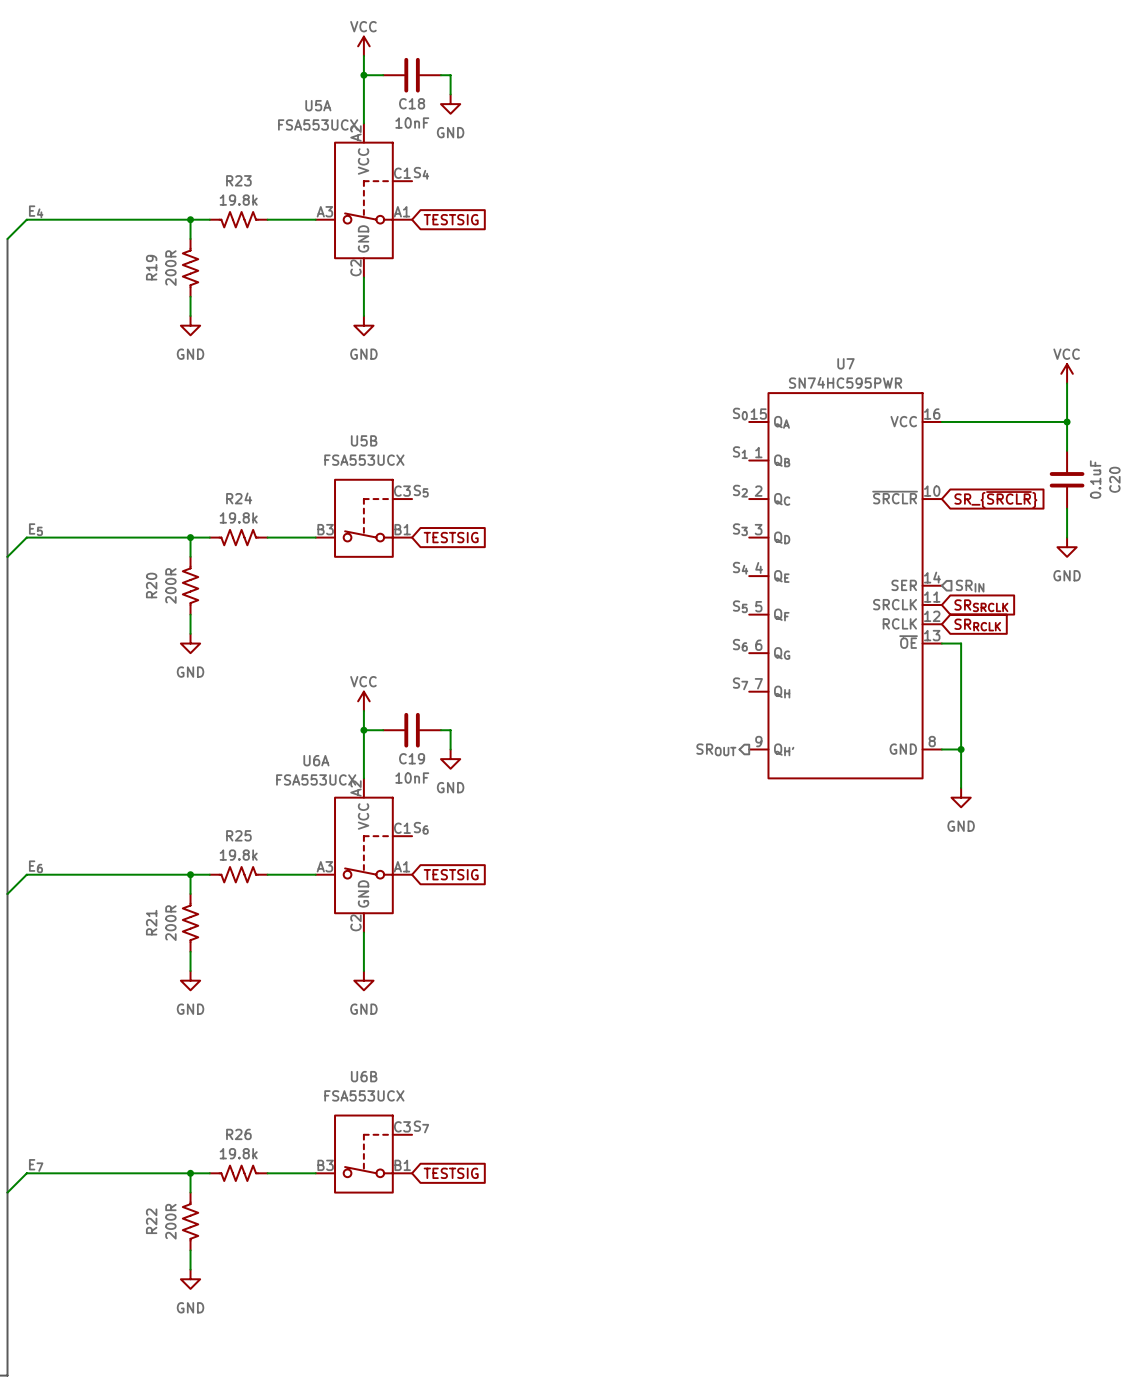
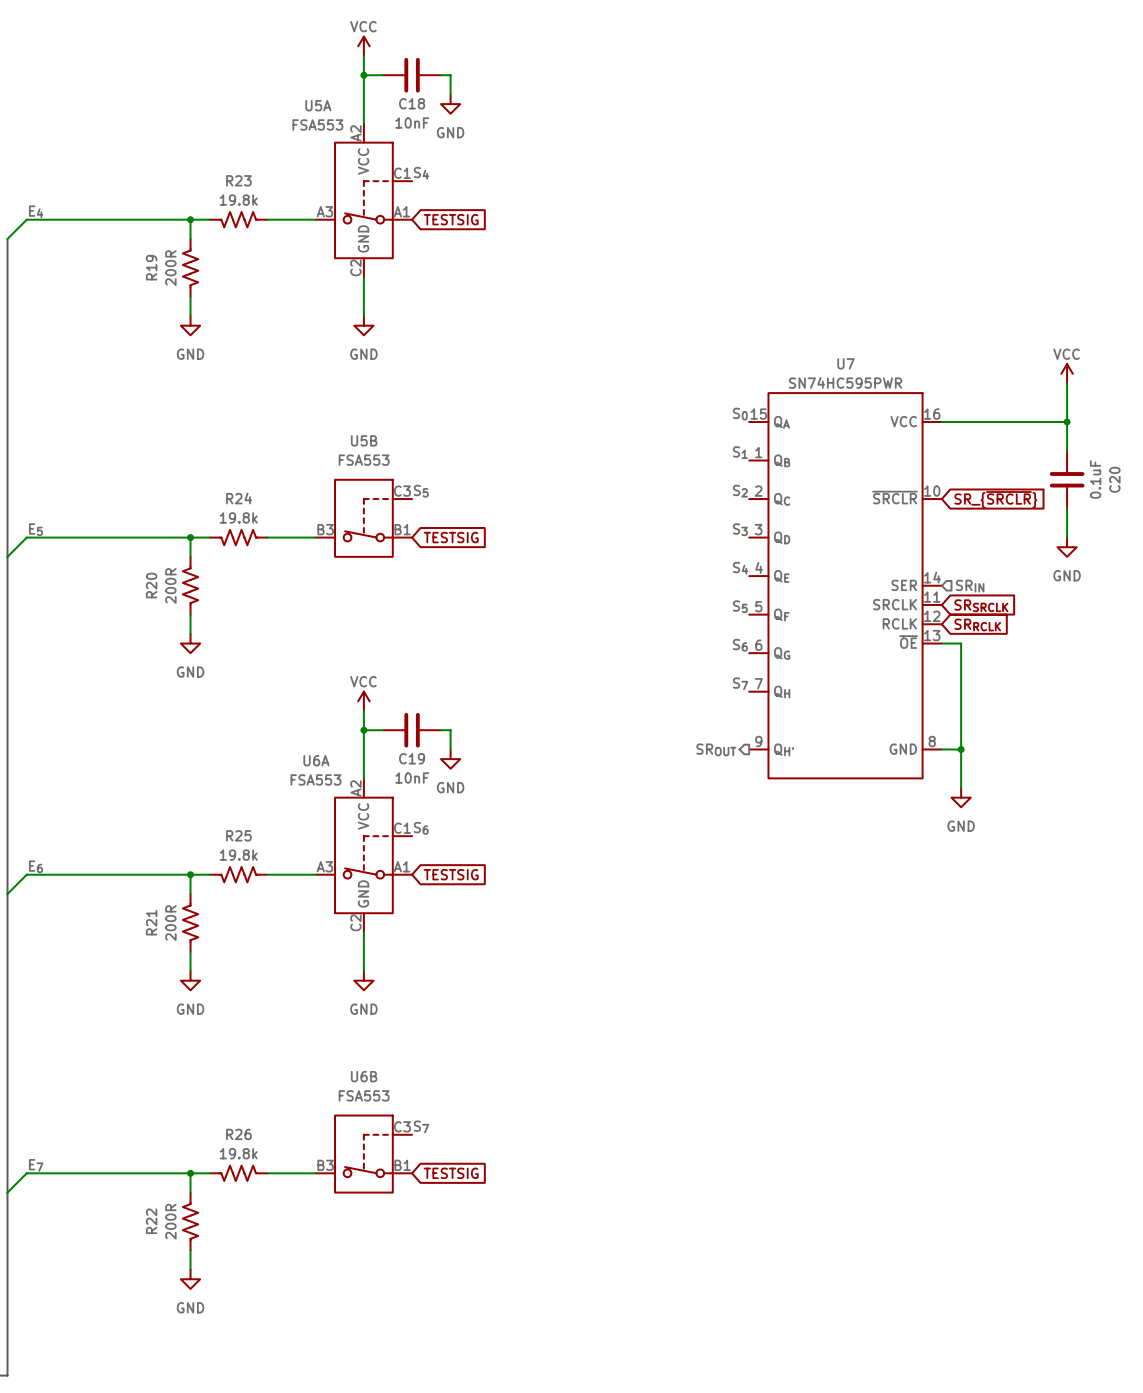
U5A value: FSA553UCX (318, 124) -> FSA553 (317, 124)
U5B value: FSA553UCX (364, 460) -> FSA553 (364, 460)
U6A value: FSA553UCX (316, 779) -> FSA553 (315, 779)
U6B value: FSA553UCX (364, 1095) -> FSA553 (364, 1095)

